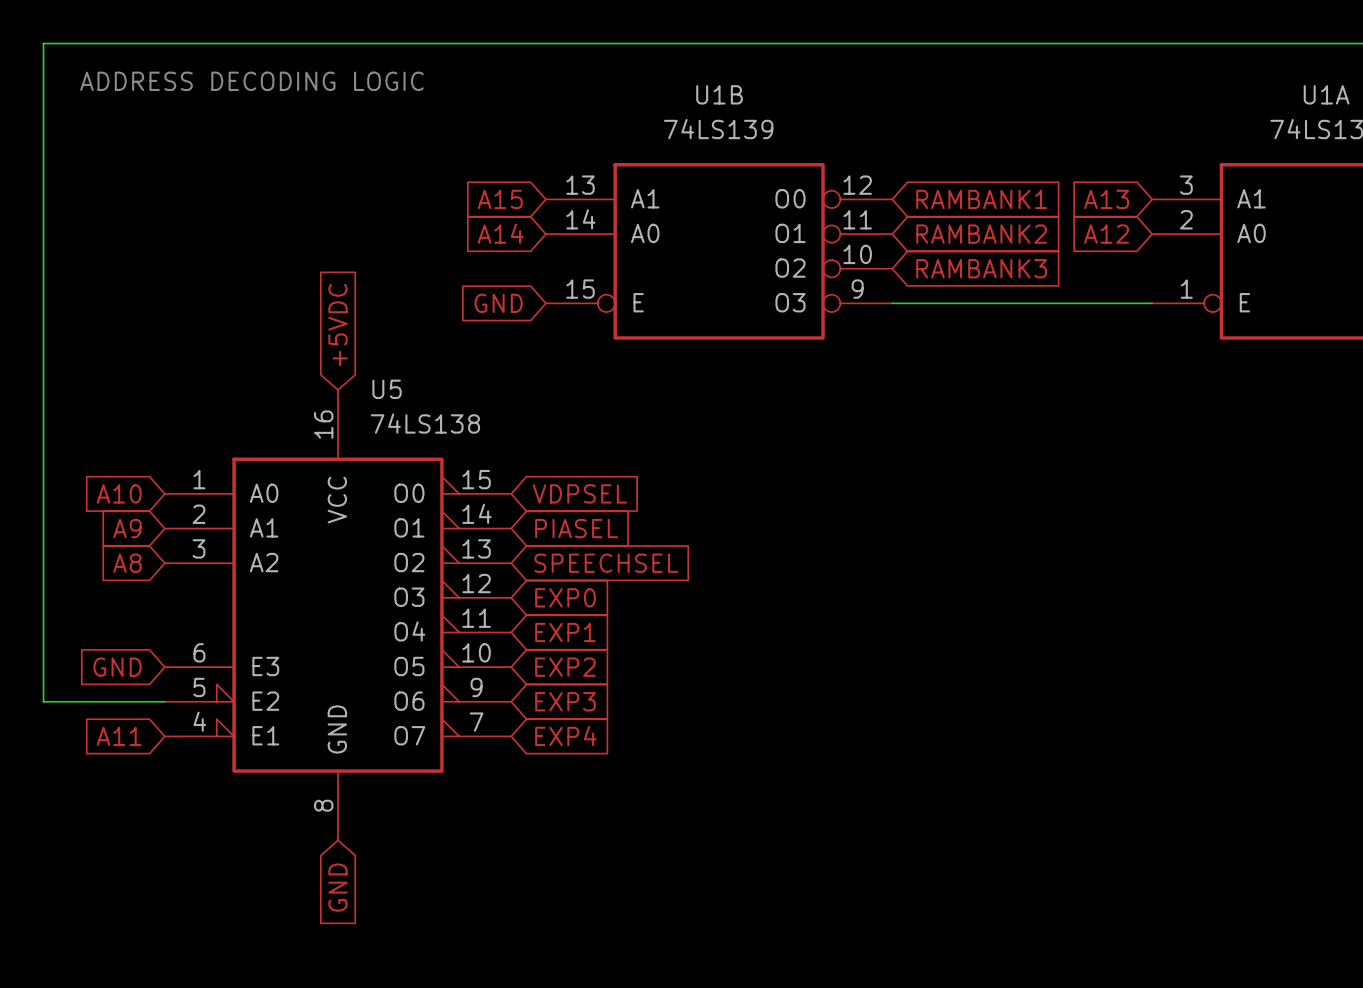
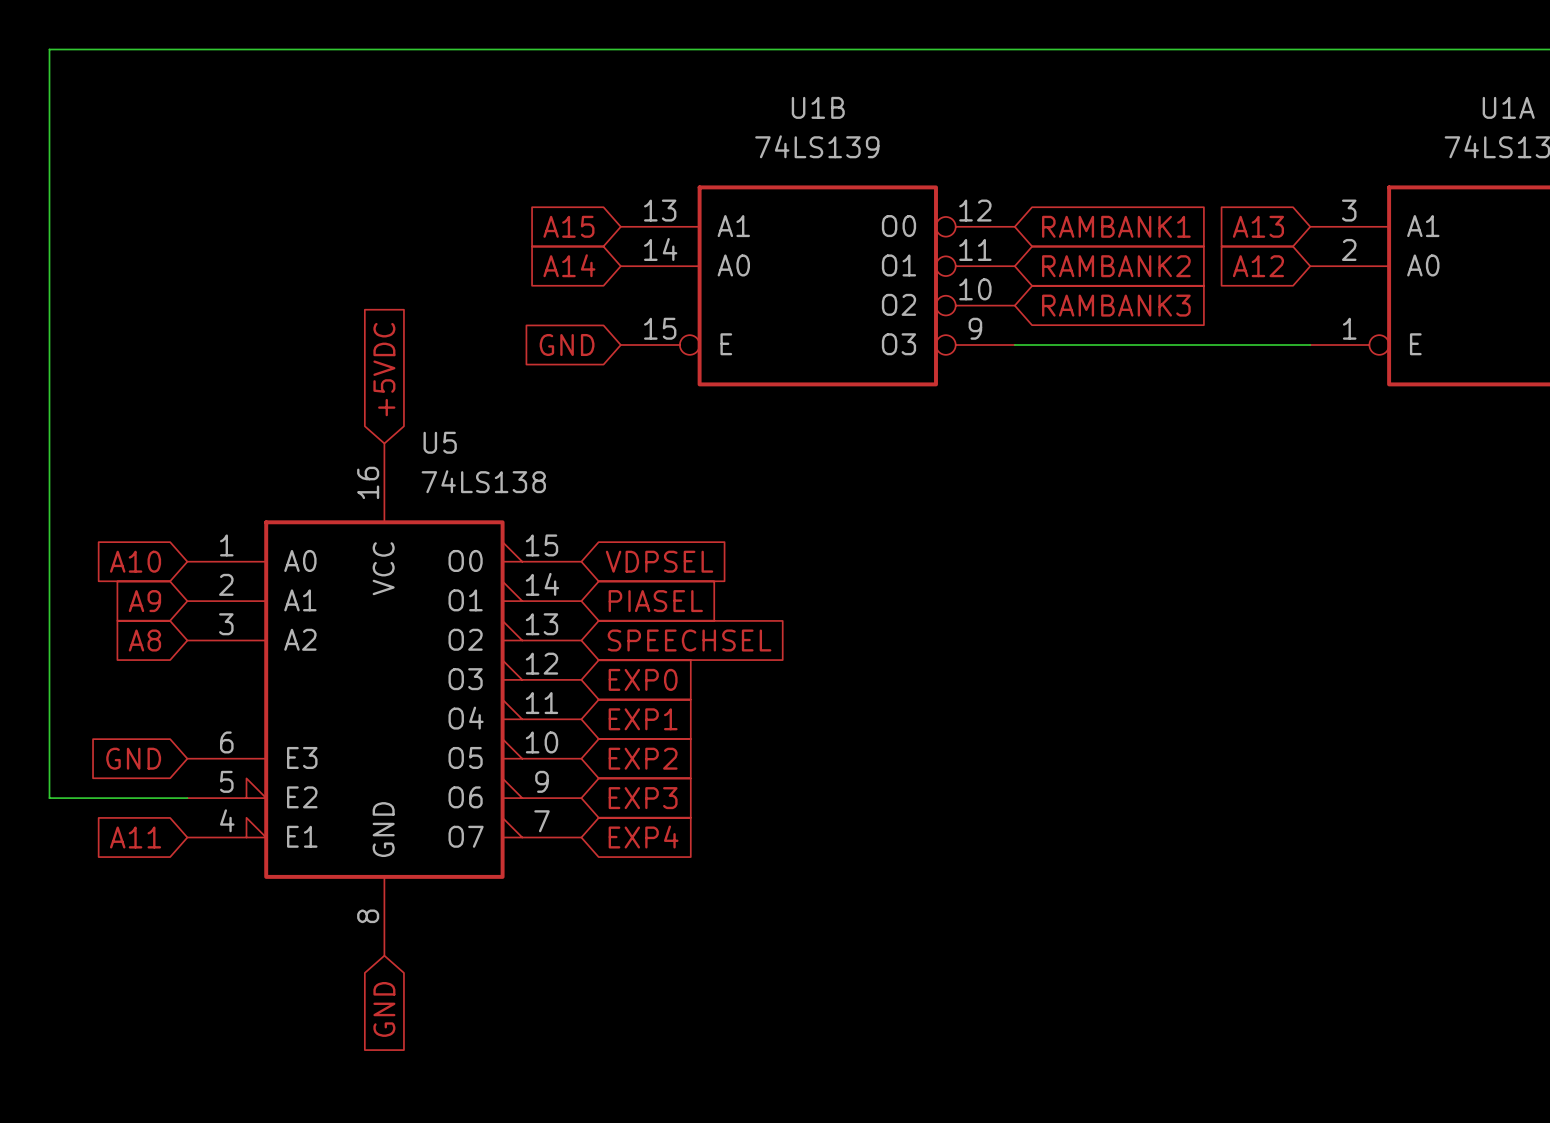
text: ADDRESS DECODING LOGIC (251, 81) -> none

